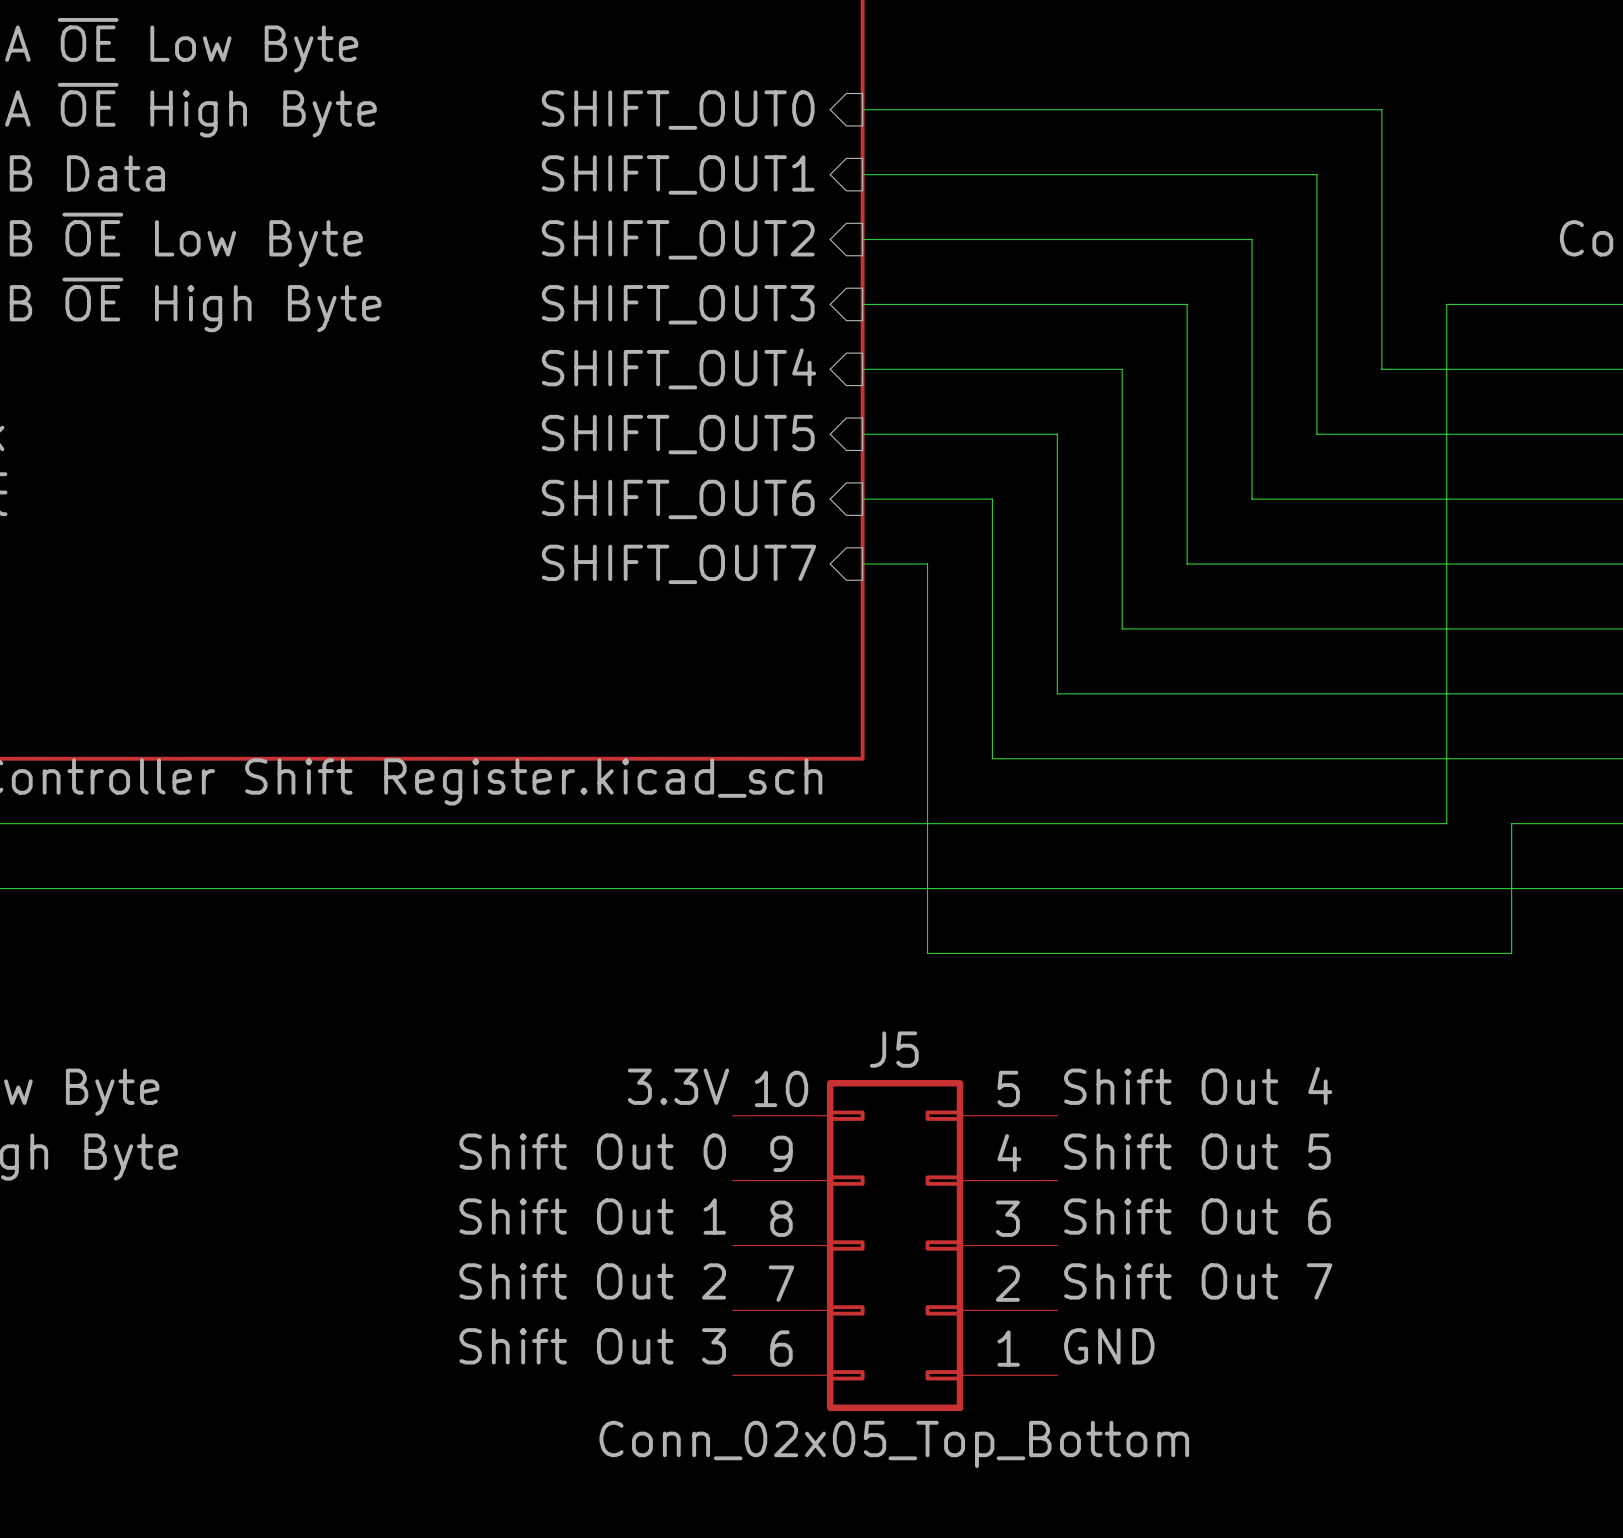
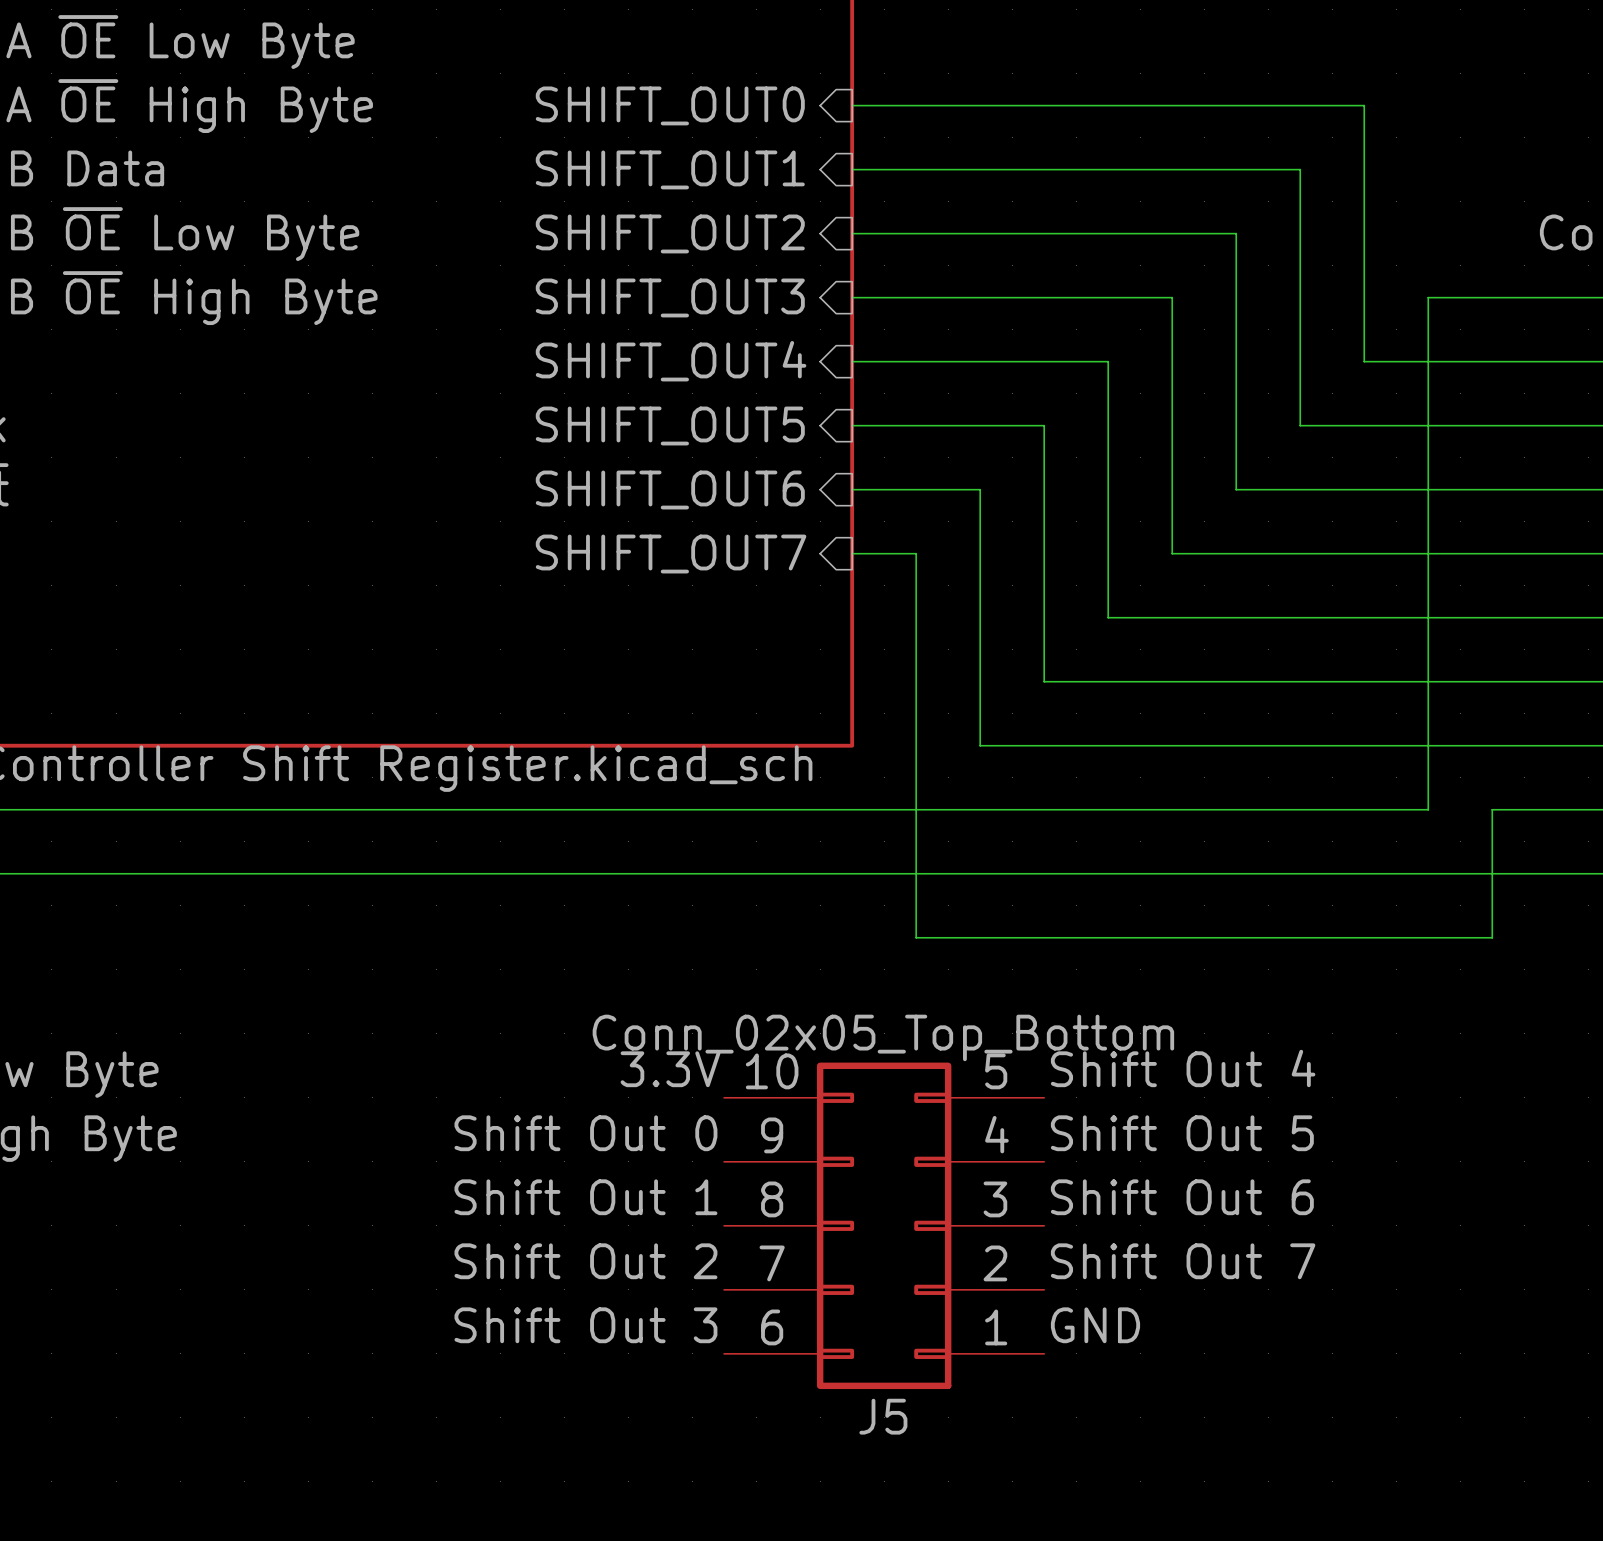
J5 name position: J5 (894, 1049) -> J5 (883, 1416)
J5 value position: Conn_02x05_Top_Bottom (894, 1444) -> Conn_02x05_Top_Bottom (883, 1037)

